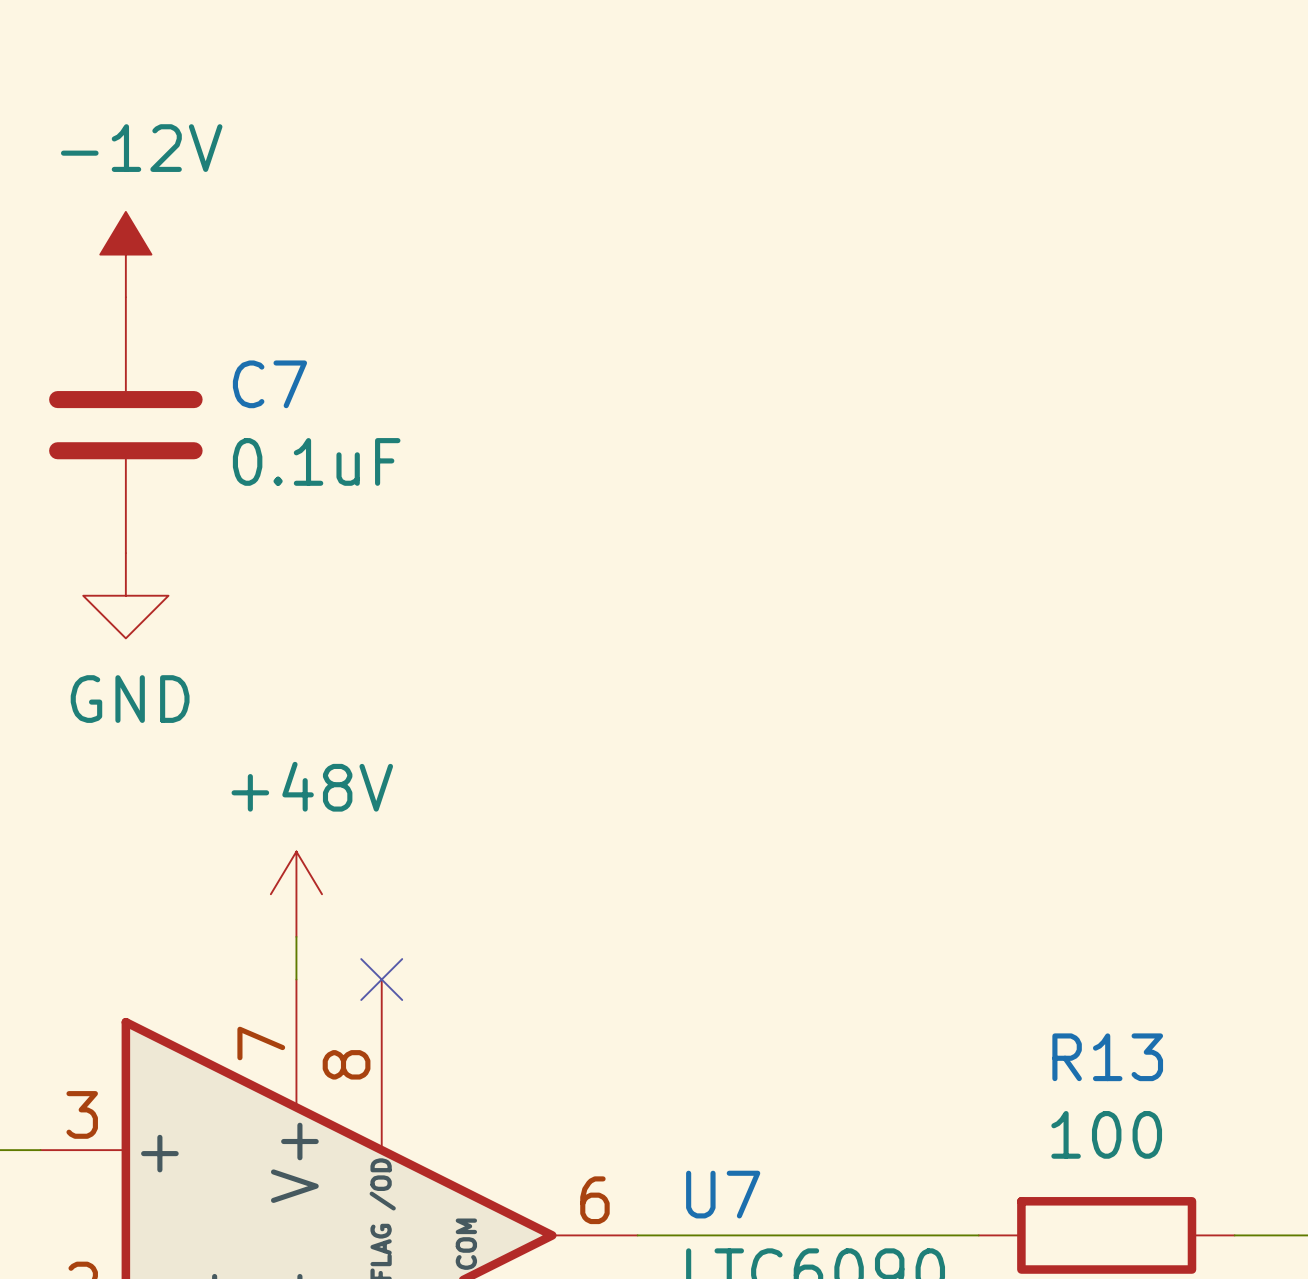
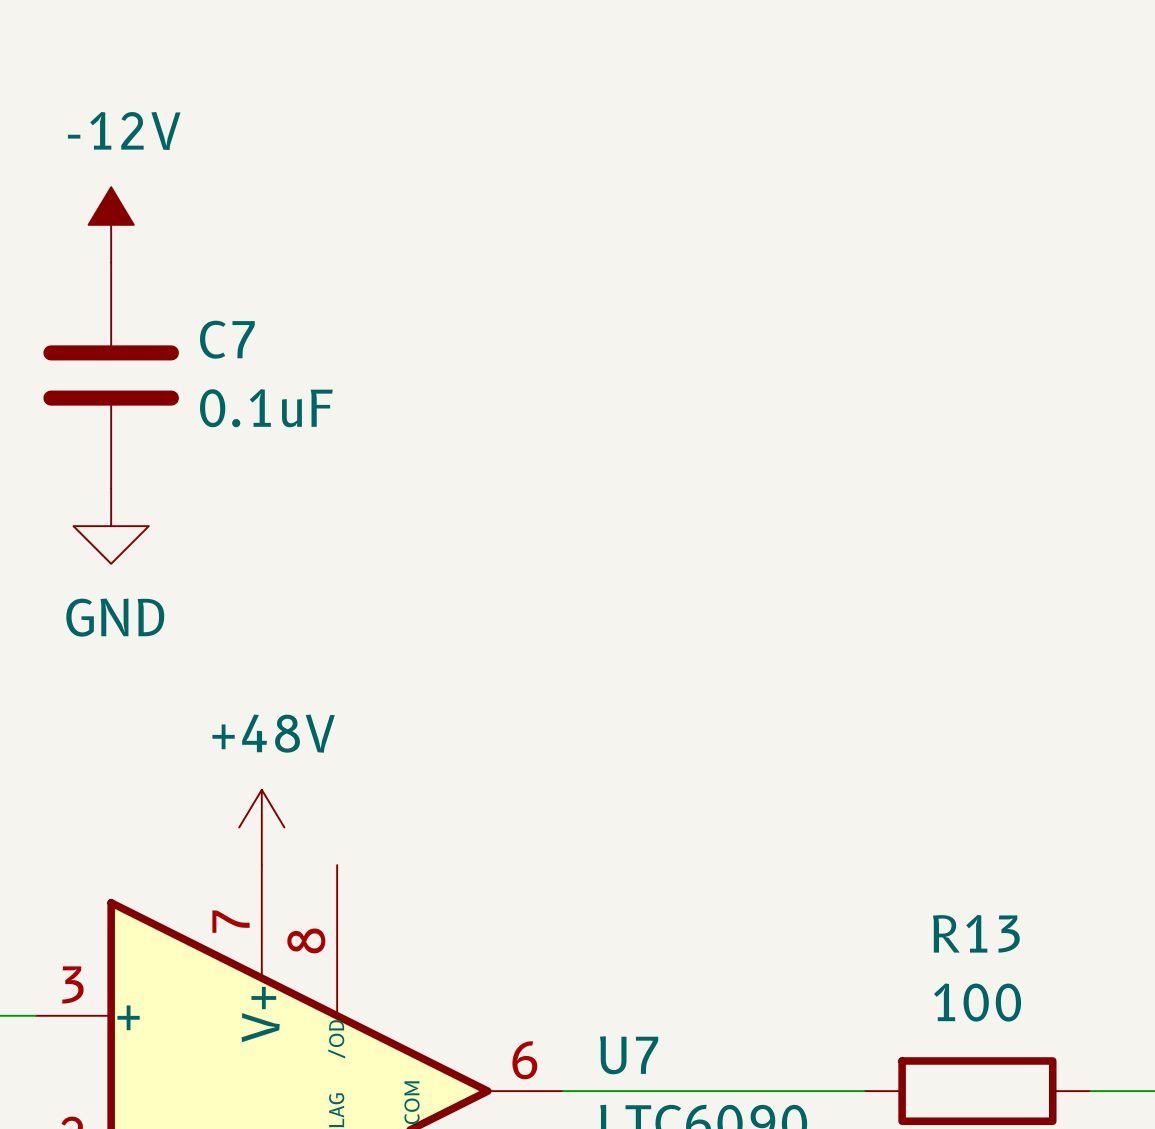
power symbol position: +48V (296, 894) -> +48V (261, 827)
no-connect mark: (381, 979) -> none

